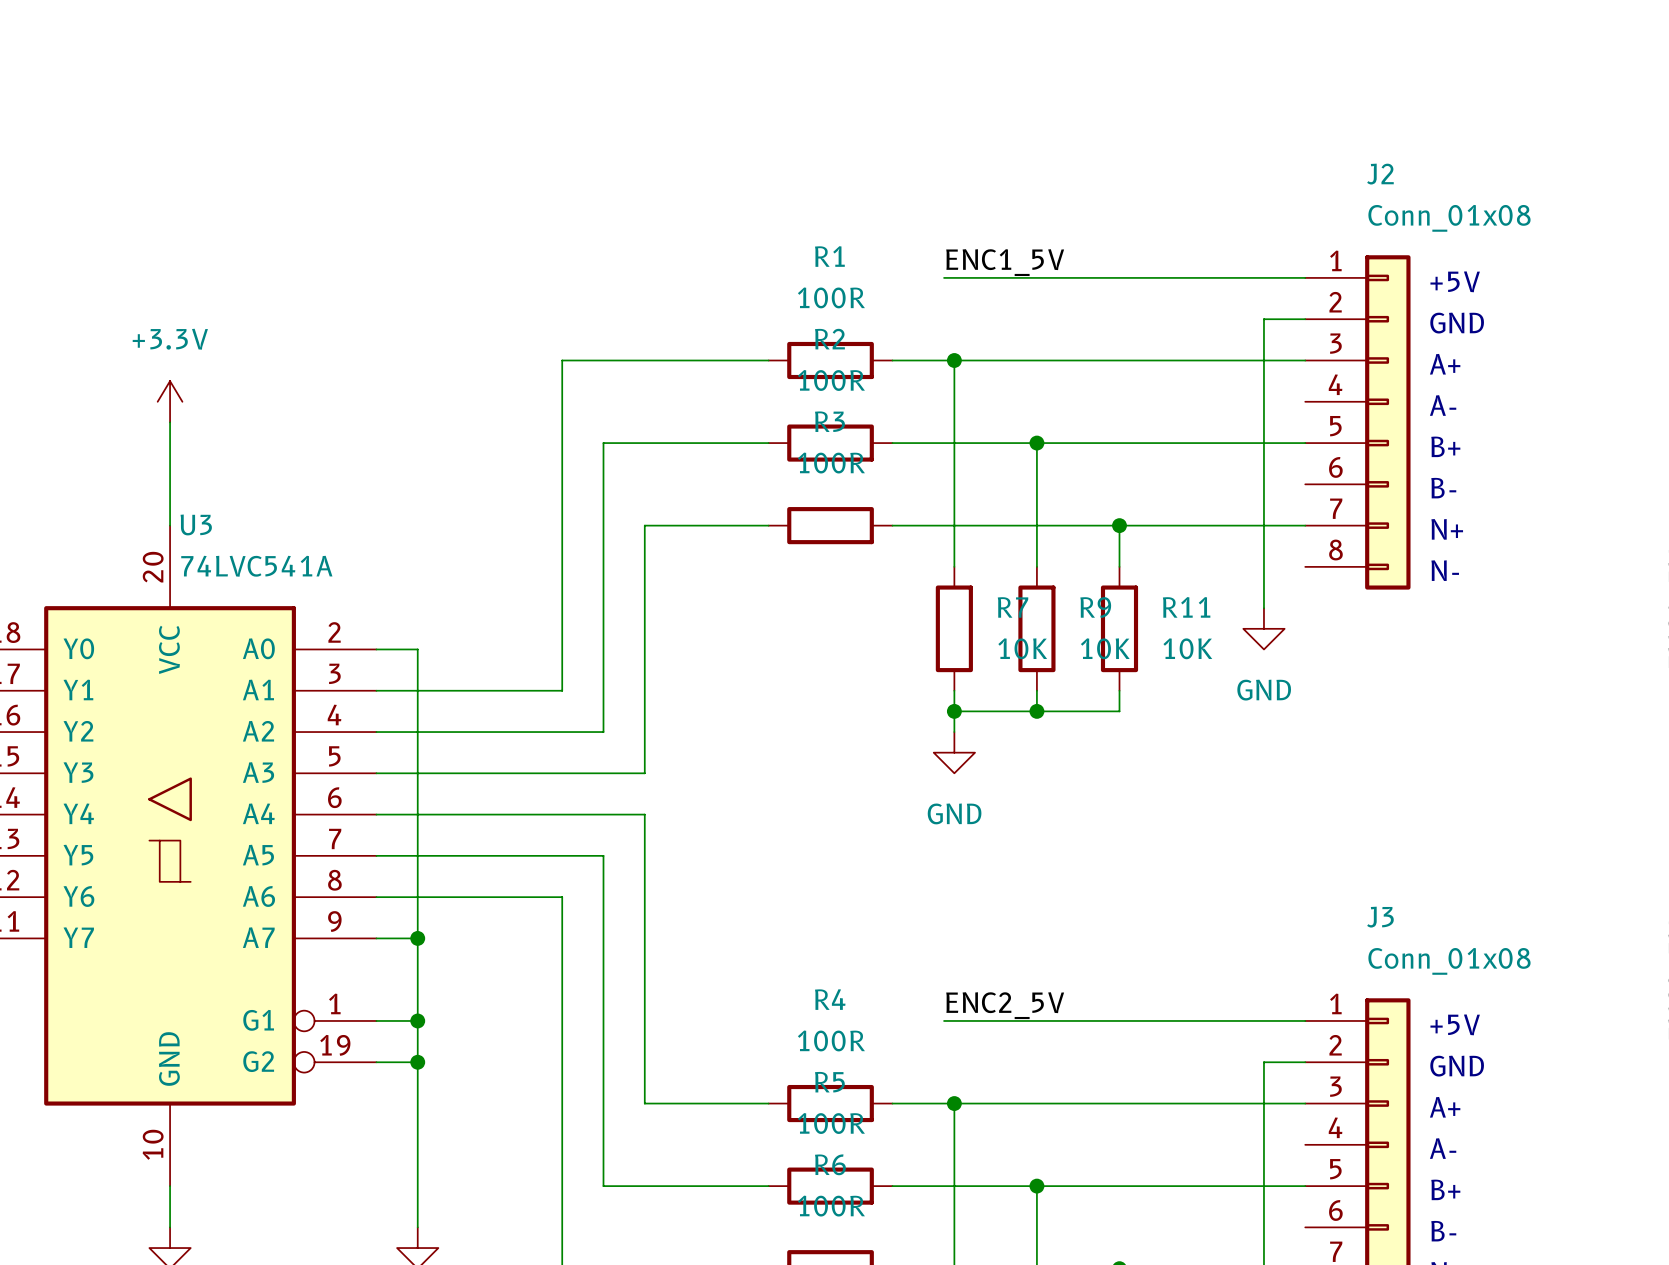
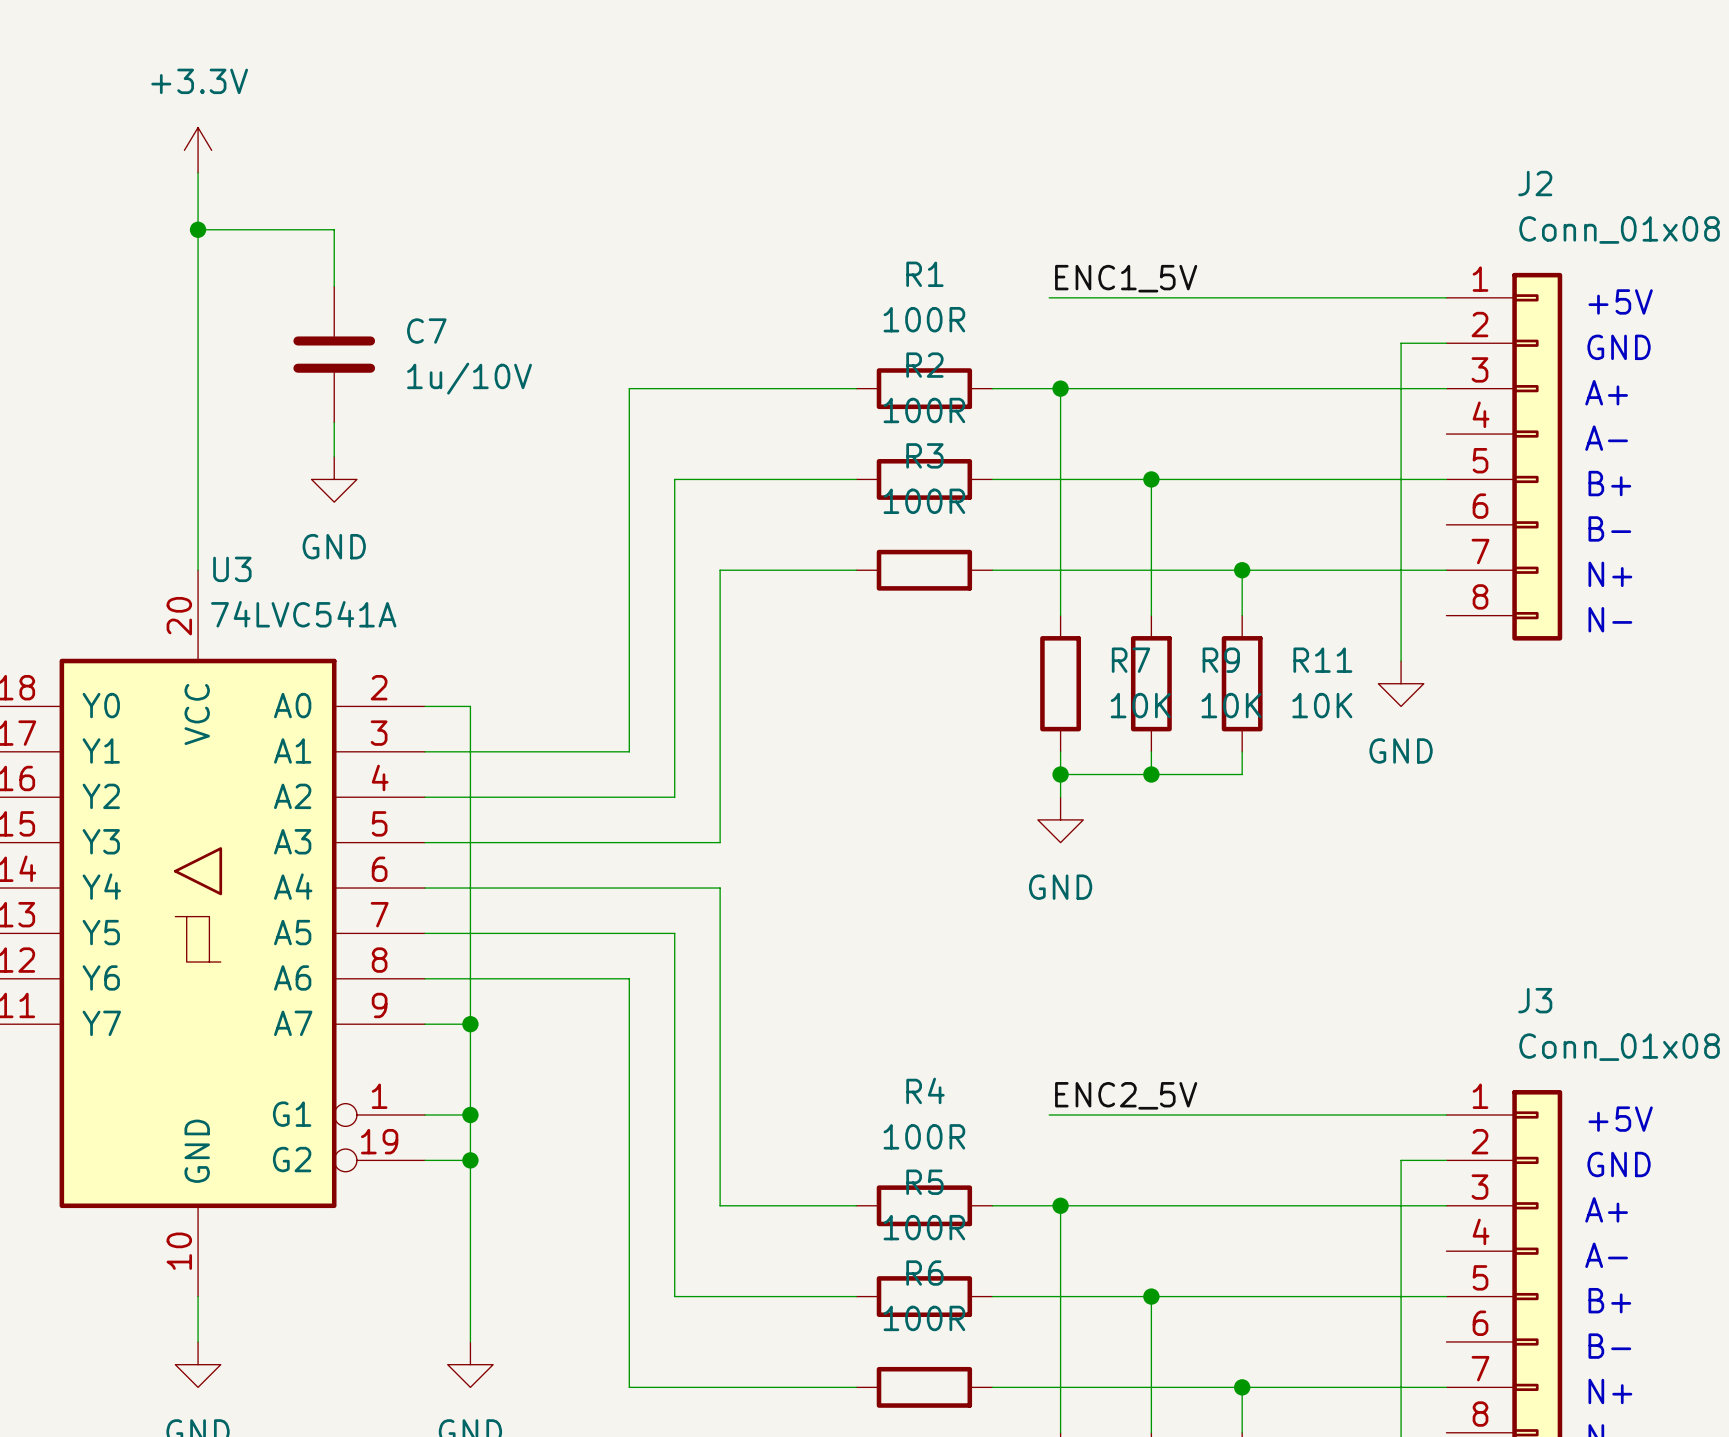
wire: none -> (198, 173) (198, 456)
wire: none -> (198, 229) (334, 229) (334, 286)
junction: none -> (198, 229)
C7: none -> 1u/10V (334, 354)
wire: none -> (334, 422) (334, 456)
power symbol position: +3.3V (170, 401) -> +3.3V (198, 150)
power symbol: none -> GND (334, 479)

